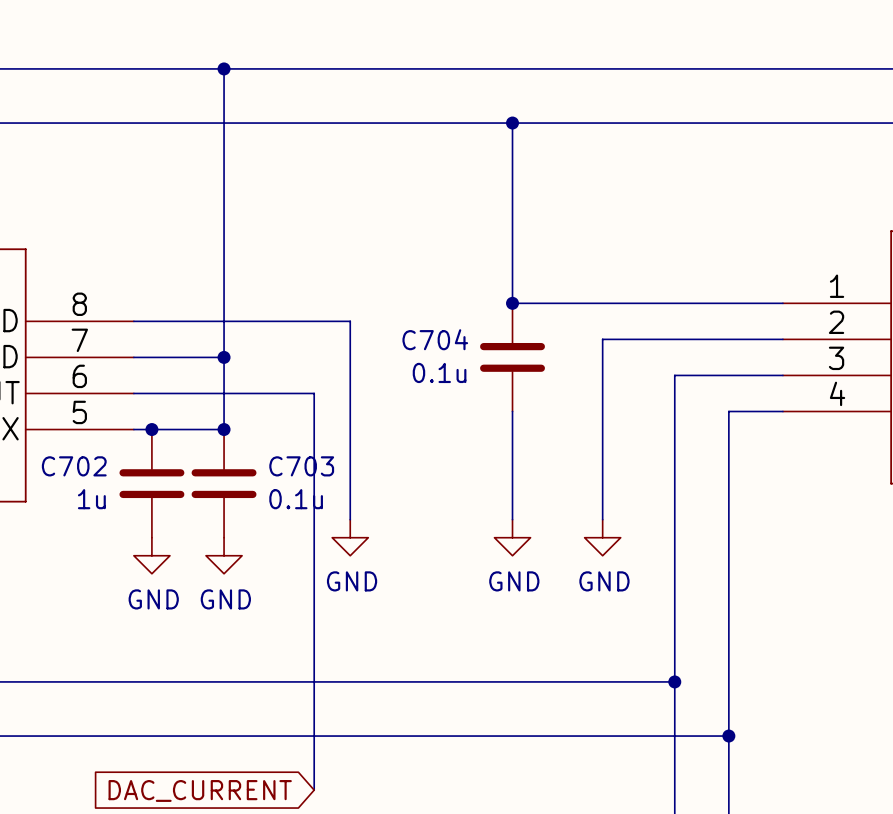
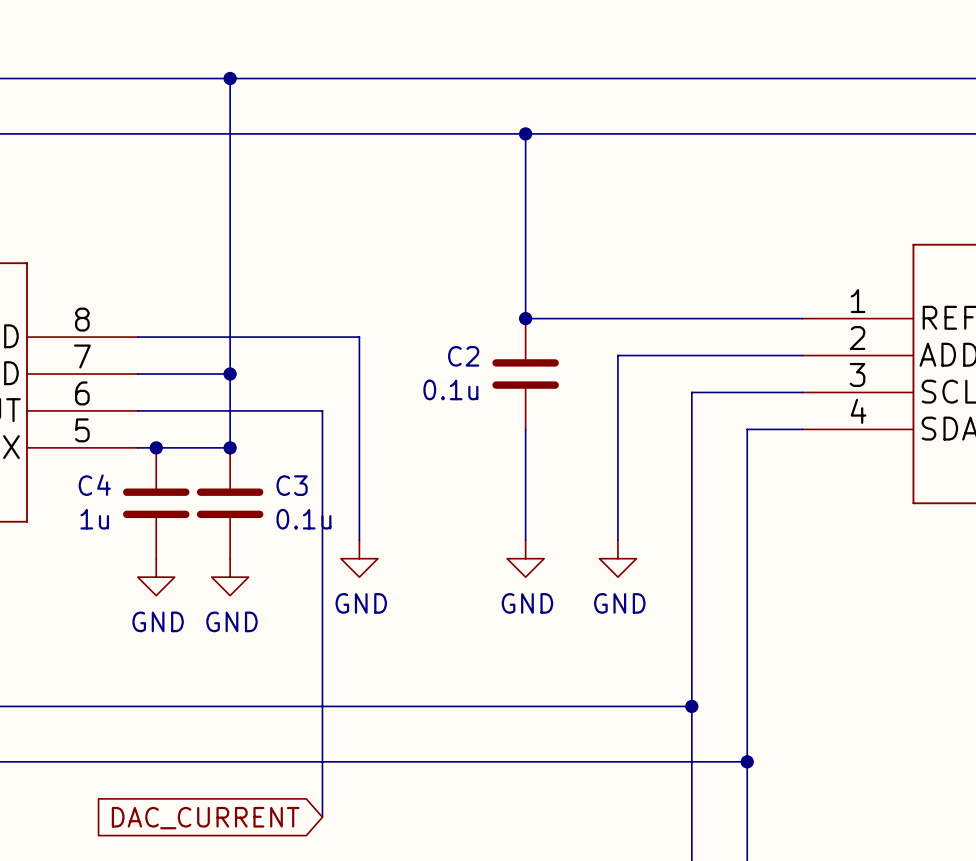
C704 name: C704 (435, 339) -> C2 (463, 356)
C702 name: C702 (74, 466) -> C4 (94, 485)
C703 name: C703 (301, 466) -> C3 (292, 485)

